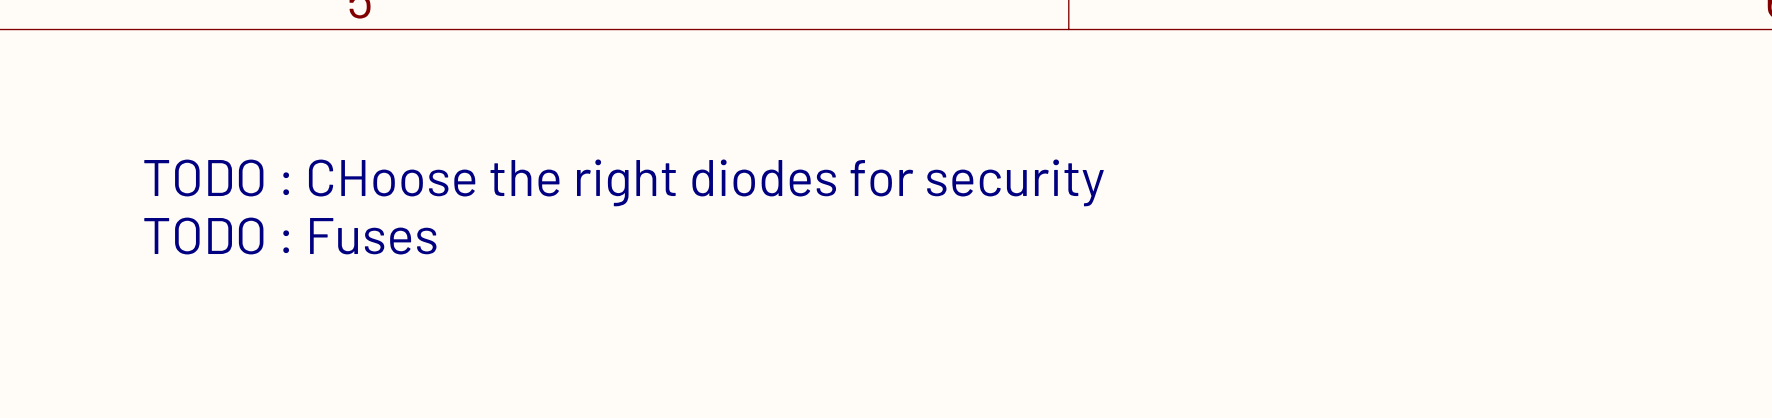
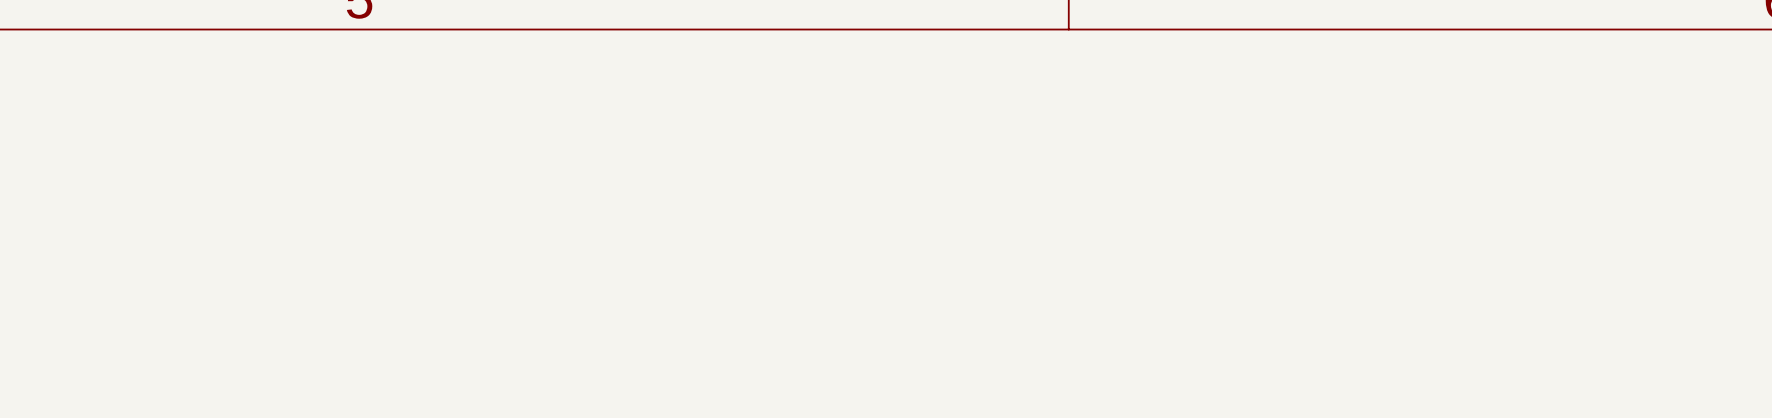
text: TODO : CHoose the right diodes for security (624, 182) -> none
text: TODO : Fuses (290, 236) -> none

